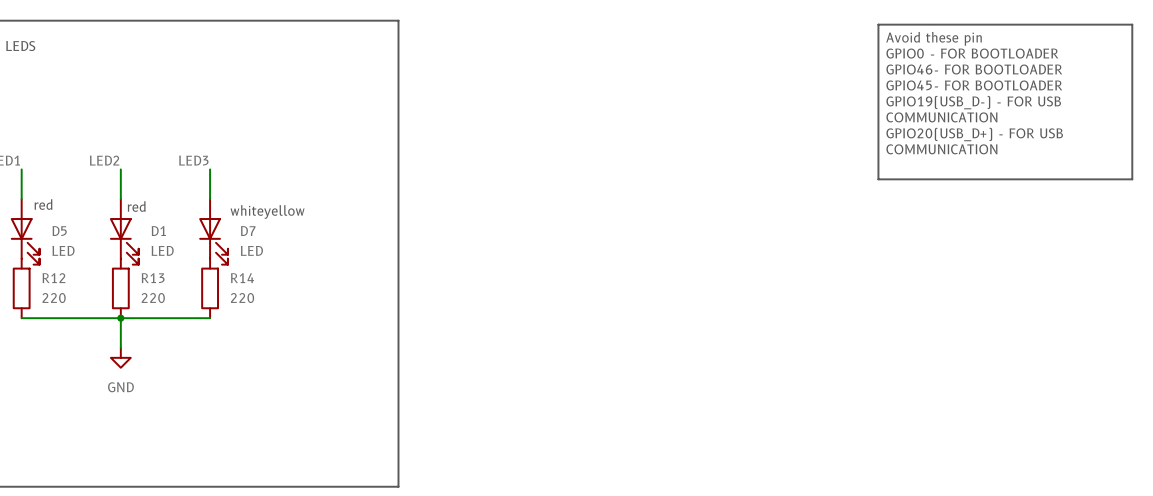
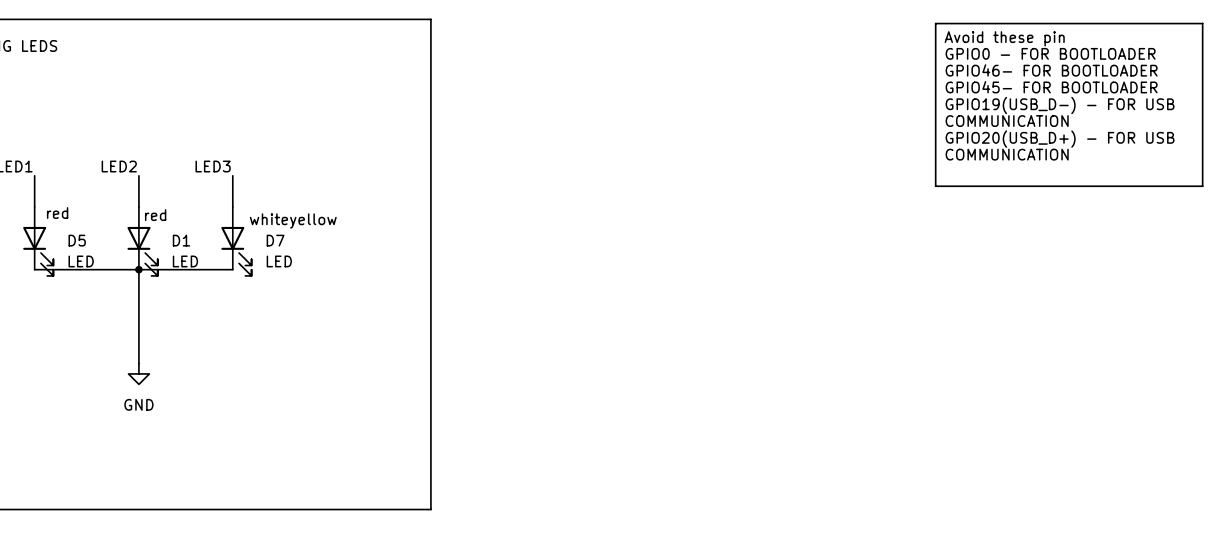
wire: none -> (138, 269) (138, 332)
junction: none -> (138, 269)
R12: 220 (21, 288) -> none
R13: 220 (120, 288) -> none
R14: 220 (210, 288) -> none
wire: (21, 318) (210, 318) -> (34, 269) (232, 269)
junction: (120, 318) -> none

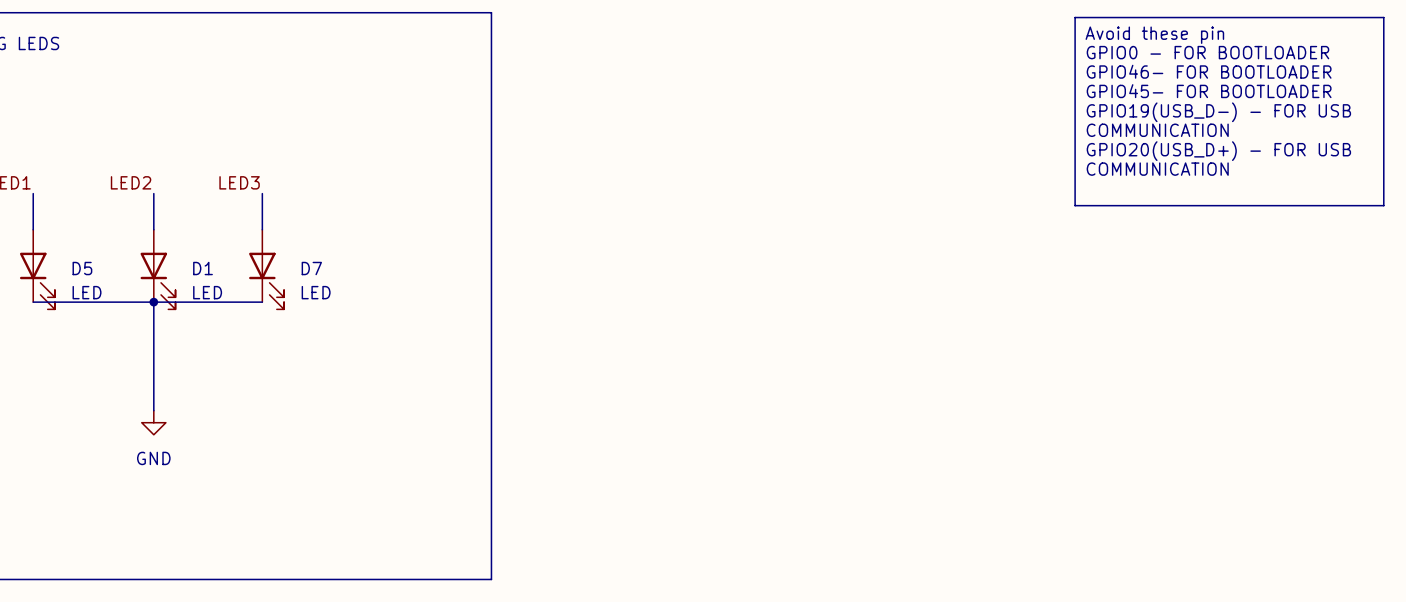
text: red (57, 213) -> none
text: red (155, 215) -> none
text: whiteyellow (293, 221) -> none

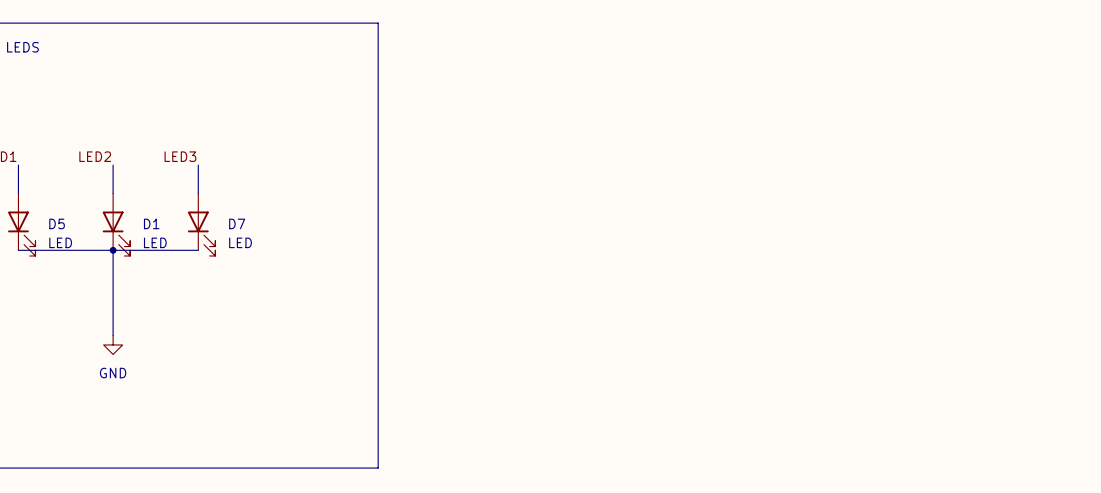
line: (1075, 17) (1383, 17) (1383, 205) (1075, 205) (1075, 17) -> none
text: Avoid these pin (1154, 35) -> none
text: GPIO0 - FOR BOOTLOADER (1207, 52) -> none
text: GPIO46- FOR BOOTLOADER (1209, 71) -> none
text: GPIO45- FOR BOOTLOADER (1209, 91) -> none
text: GPIO19(USB_D-) - FOR USB (1218, 112) -> none
text: COMMUNICATION (1157, 130) -> none
text: GPIO20(USB_D+) - FOR USB (1218, 151) -> none
text: COMMUNICATION (1157, 169) -> none

